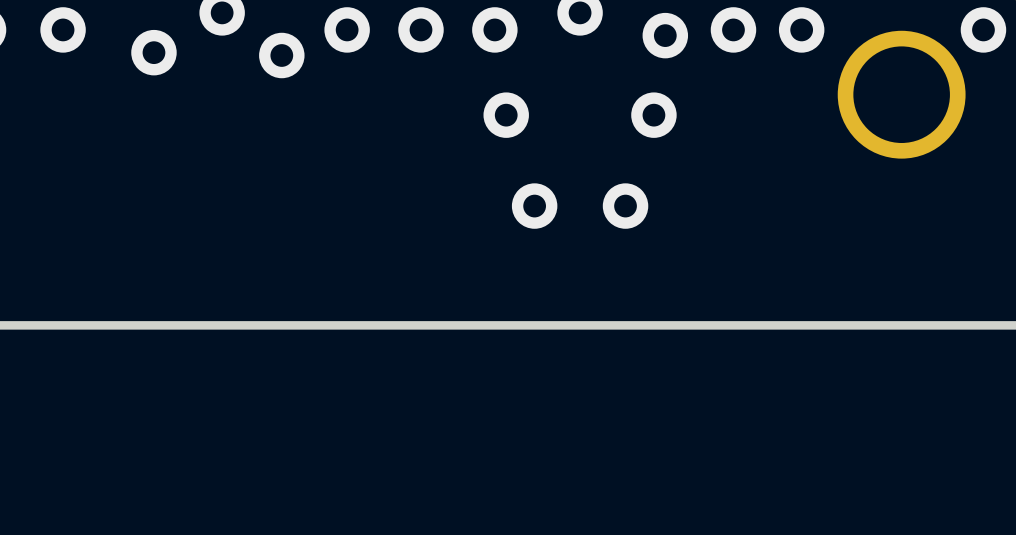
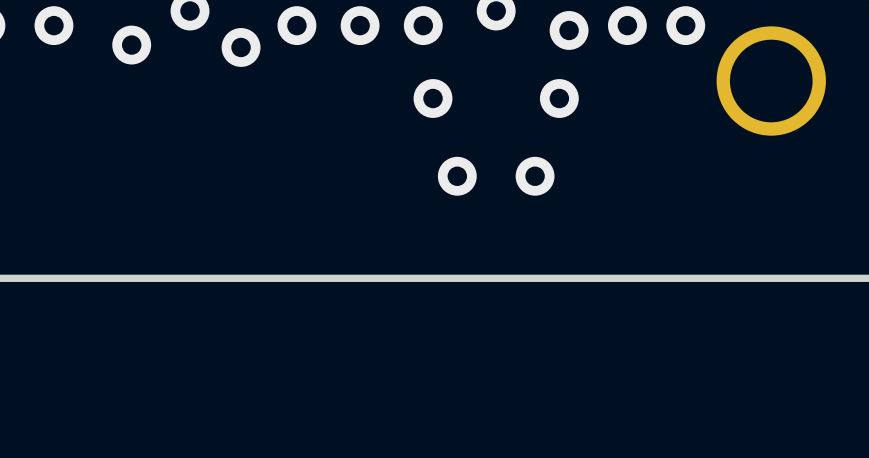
via: (983, 29) -> none

